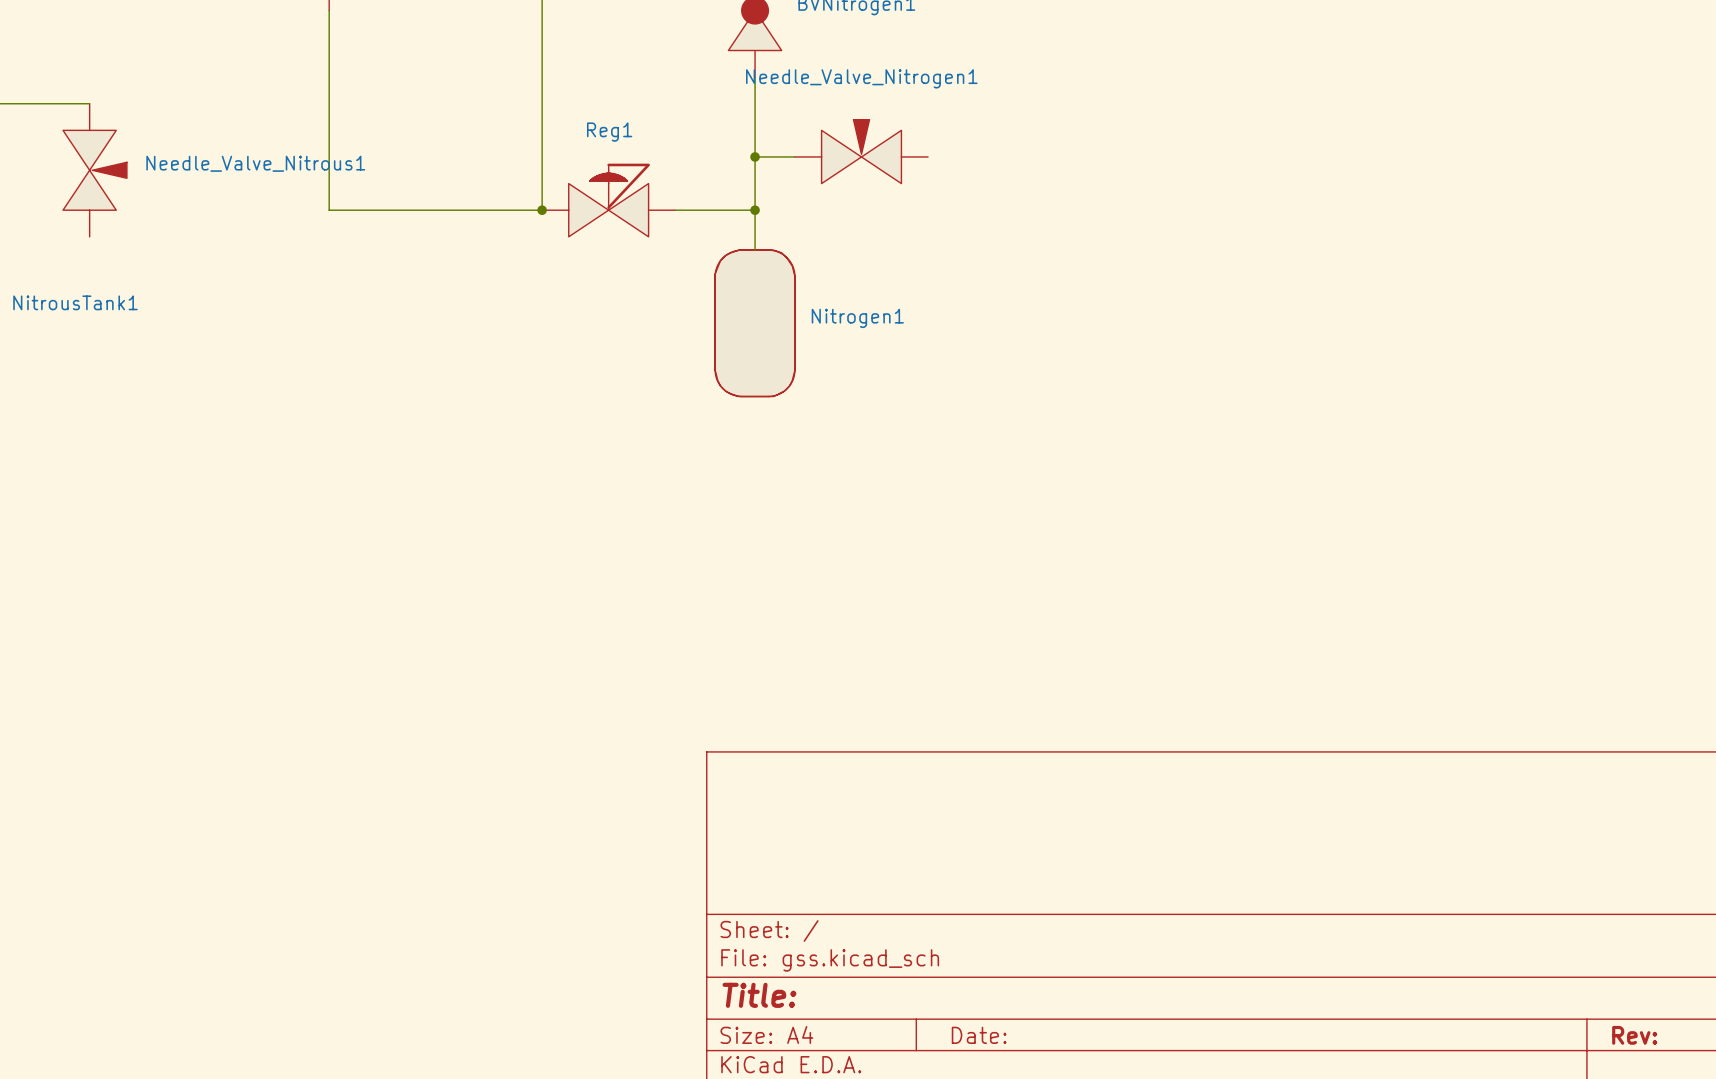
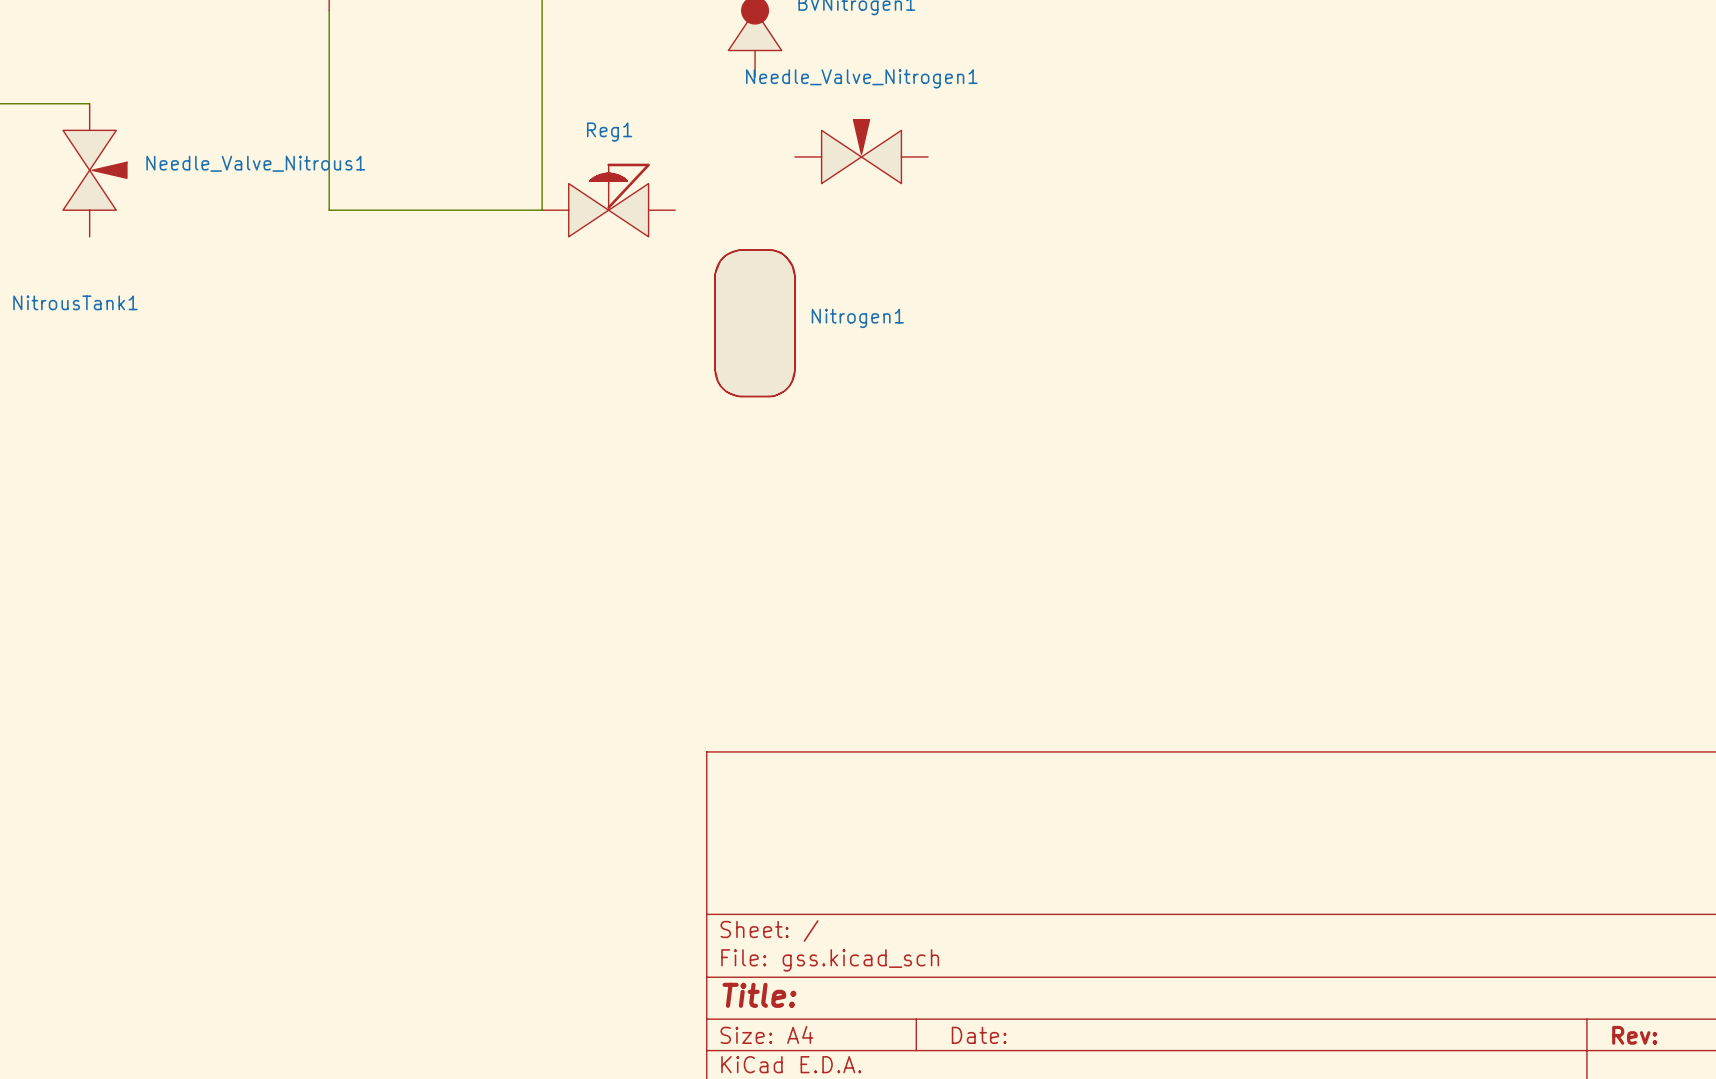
wire: (755, 77) (755, 250) -> none
wire: (755, 156) (794, 156) -> none
junction: (755, 156) -> none
junction: (542, 210) -> none
wire: (675, 210) (755, 210) -> none
junction: (755, 210) -> none

